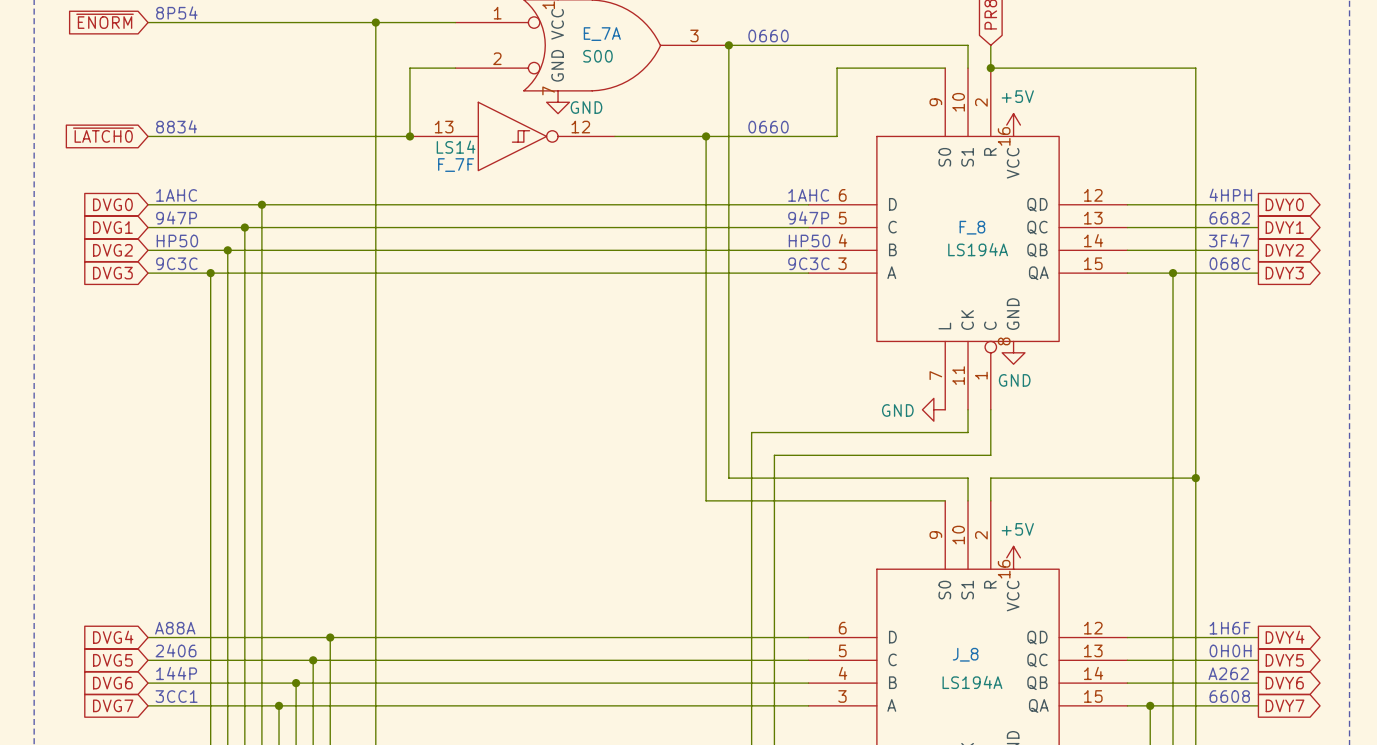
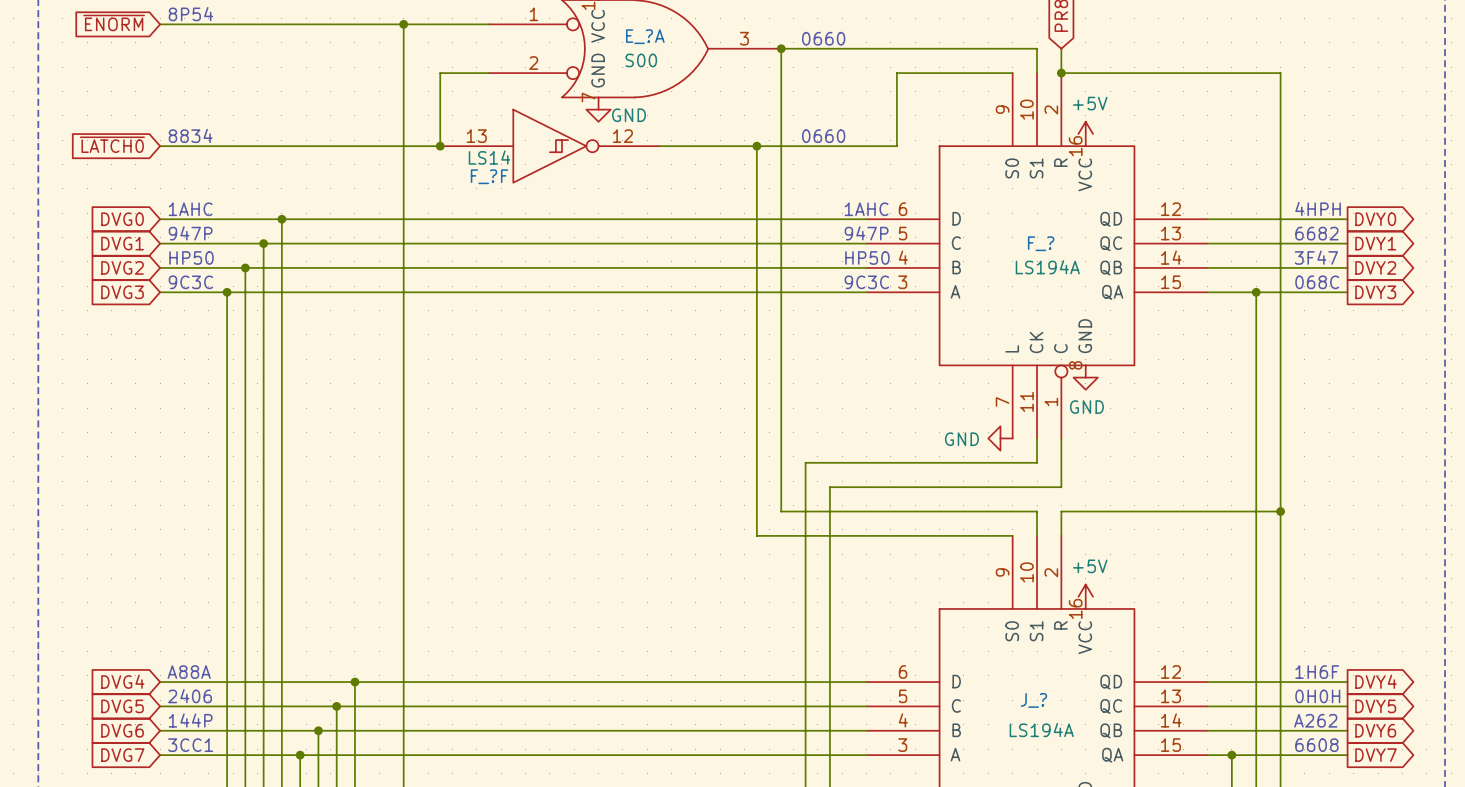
E_7A name: E_7A (602, 34) -> E_?A (645, 36)
F_7F name: F_7F (456, 165) -> F_?F (489, 176)
F_8 name: F_8 (972, 227) -> F_? (1041, 243)
J_8 name: J_8 (965, 654) -> J_? (1033, 700)

